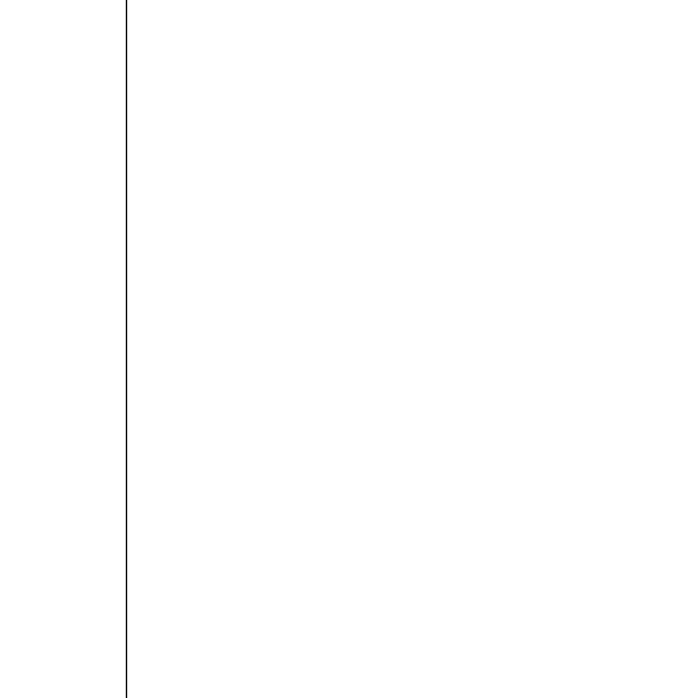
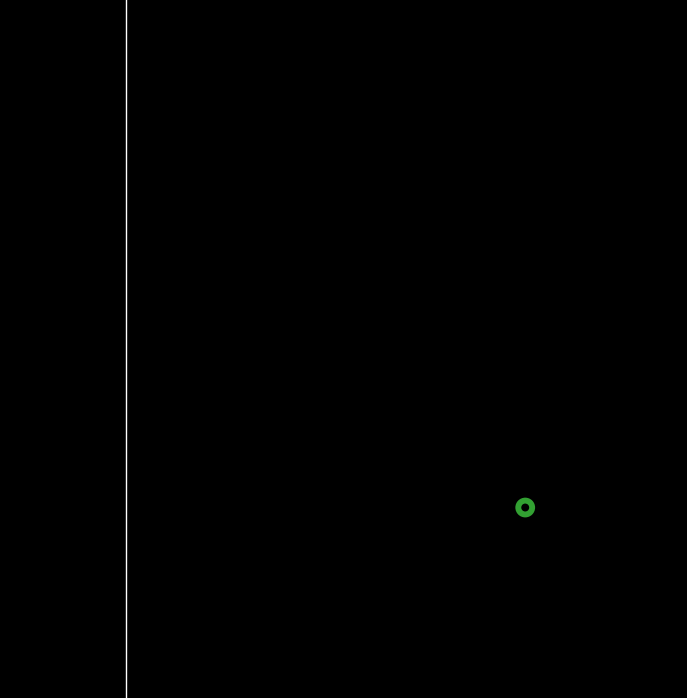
via: none -> (525, 507)

